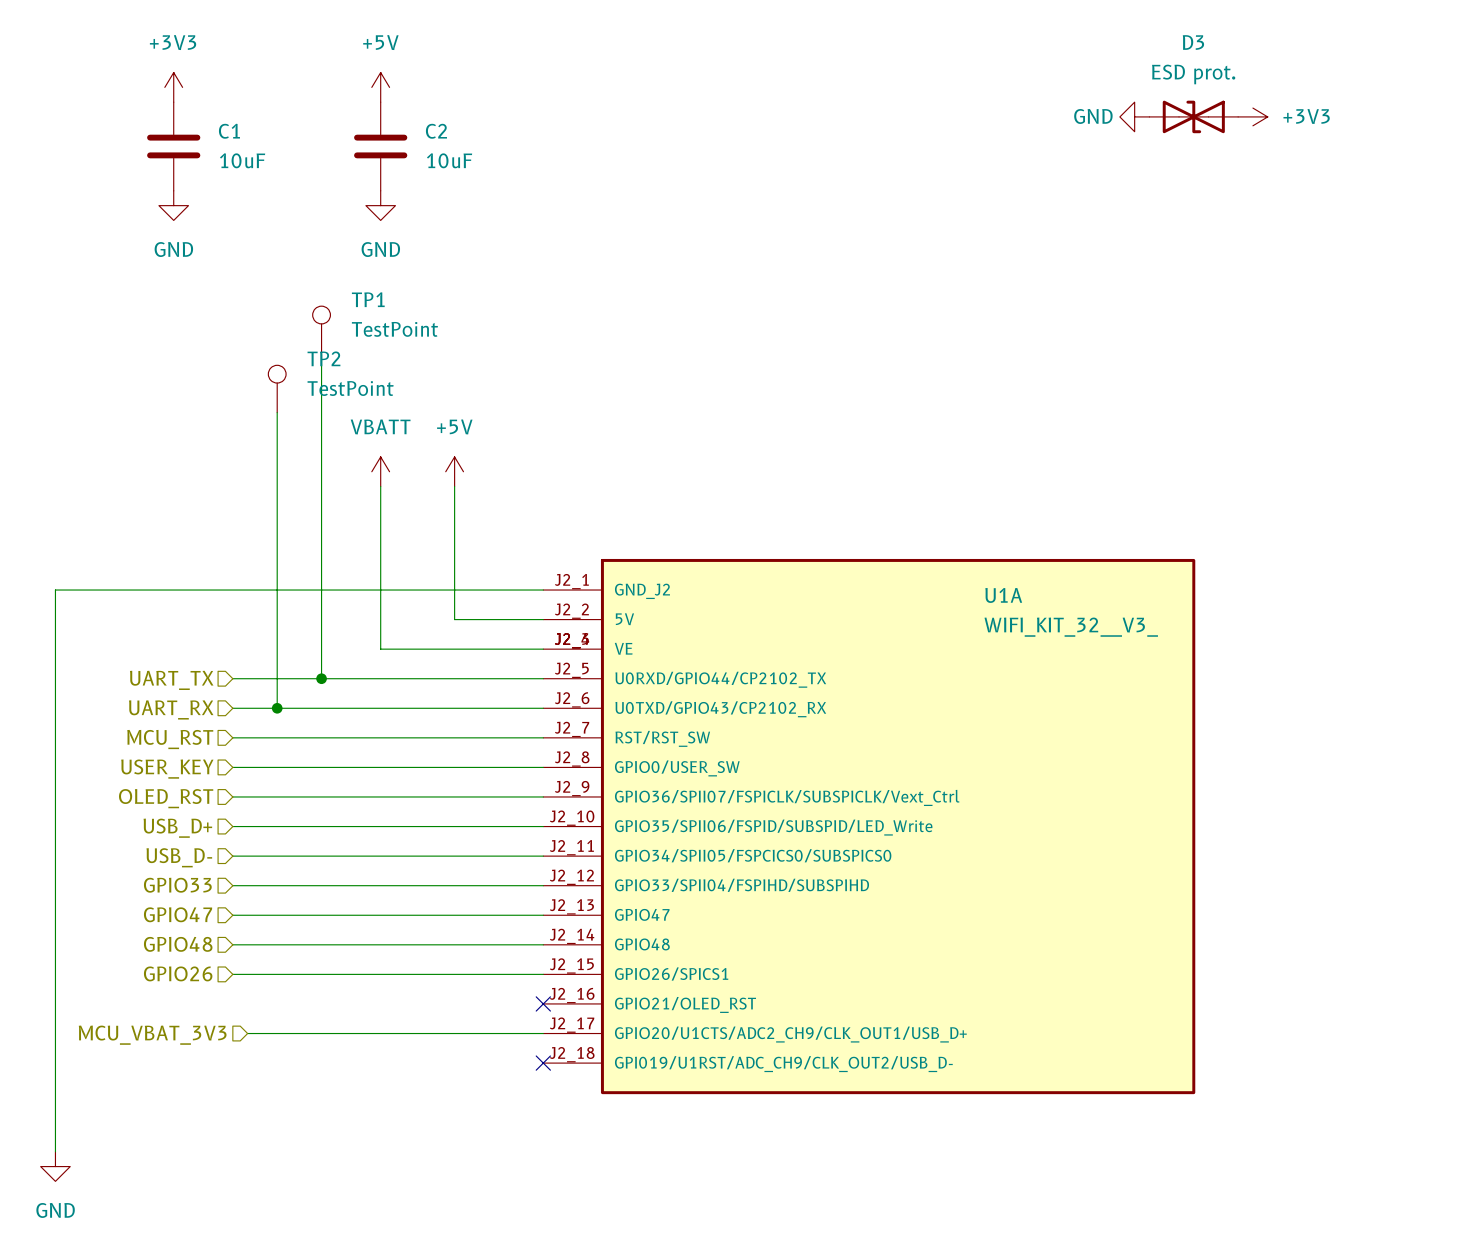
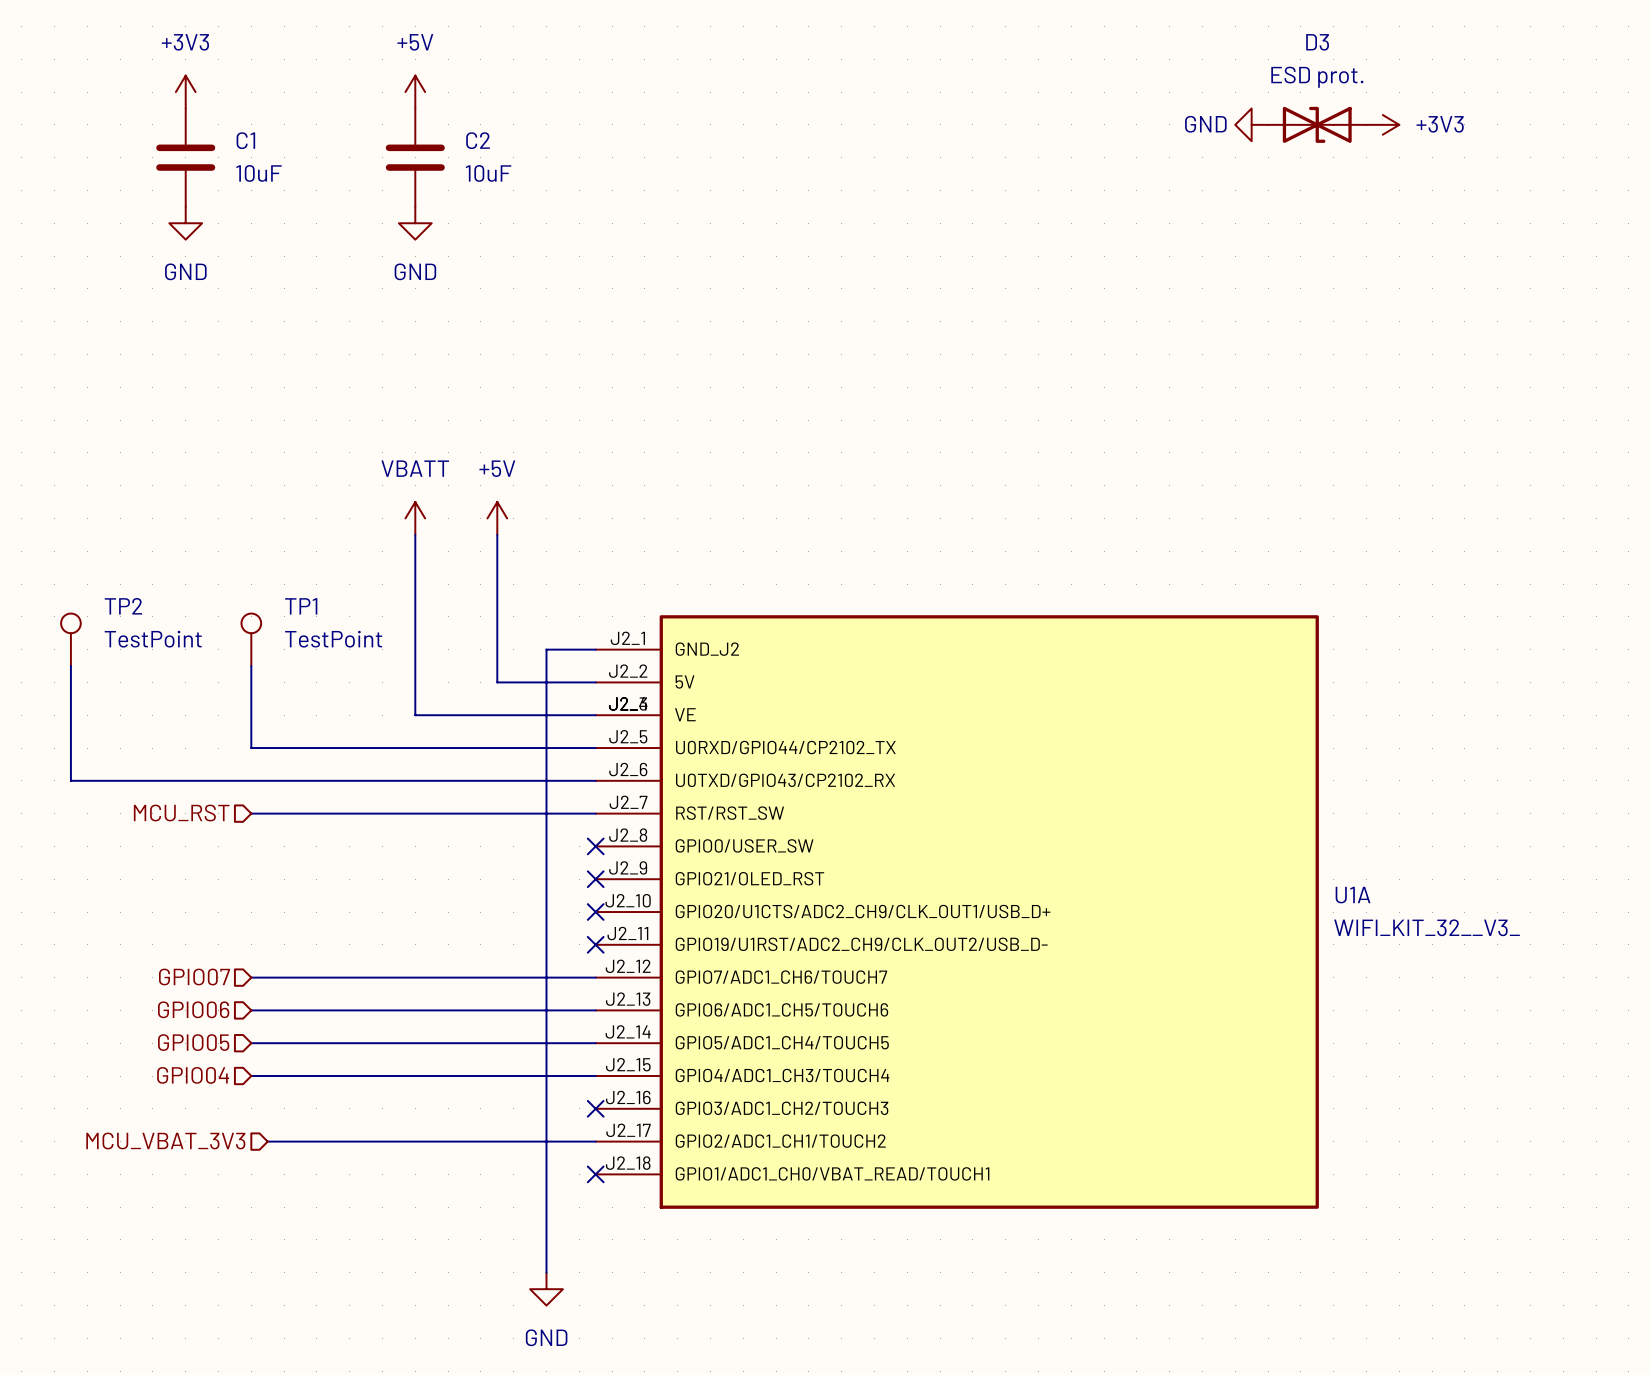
TP1 position: (321, 329) -> (251, 639)
wire: (321, 353) (321, 678) -> none
TP2 position: (277, 388) -> (70, 639)
wire: (277, 412) (277, 708) -> none
U1A symbol: [543, 558, 1196, 1095] -> [595, 615, 1319, 1209]
wire: (498, 590) (55, 590) (55, 1151) -> (546, 649) (546, 1272)
U1A name position: U1A (1003, 595) -> U1A (1353, 895)
wire: none -> (70, 666) (70, 780) (251, 780)
wire: none -> (251, 666) (251, 748)
U1A value position: WIFI_KIT_32__V3_ (1071, 627) -> WIFI_KIT_32__V3_ (1427, 927)
junction: (321, 678) -> none
hierarchical label: UART_TX (171, 680) -> none
junction: (277, 708) -> none
hierarchical label: UART_RX (171, 709) -> none
wire: (232, 767) (543, 767) -> none
no-connect mark: none -> (595, 846)
hierarchical label: USER_KEY (167, 769) -> none
wire: (232, 796) (543, 796) -> none
no-connect mark: none -> (595, 879)
hierarchical label: OLED_RST (166, 798) -> none
wire: (232, 826) (543, 826) -> none
no-connect mark: none -> (595, 912)
hierarchical label: USB_D+ (177, 828) -> none
wire: (232, 856) (543, 856) -> none
no-connect mark: none -> (595, 944)
hierarchical label: USB_D- (179, 857) -> none
hierarchical label: GPIO33 (177, 885) -> GPIO07 (194, 977)
hierarchical label: GPIO47 (178, 914) -> GPIO06 (193, 1009)
hierarchical label: GPIO48 (178, 944) -> GPIO05 (193, 1042)
hierarchical label: GPIO26 (178, 973) -> GPIO04 (193, 1075)
power symbol: GND (55, 1166) -> none
power symbol: none -> GND (546, 1289)

